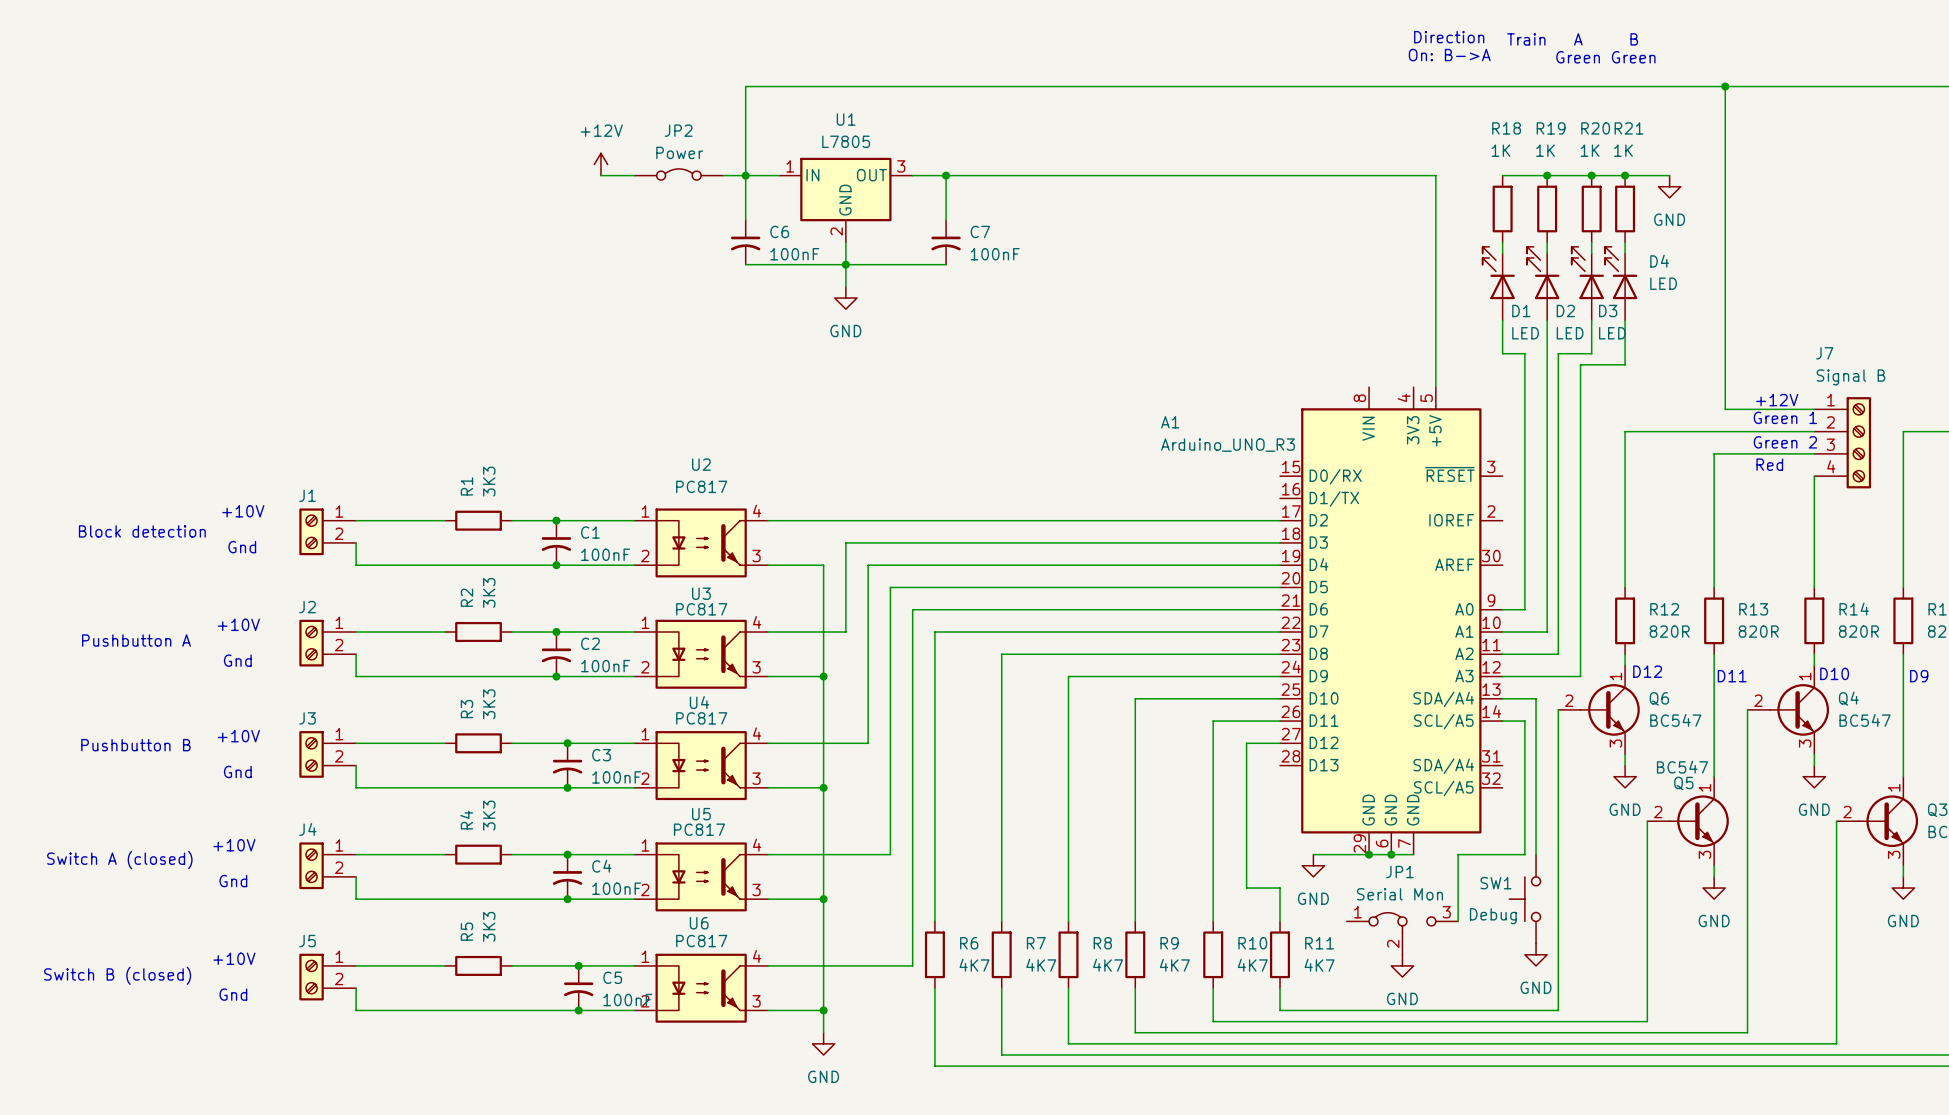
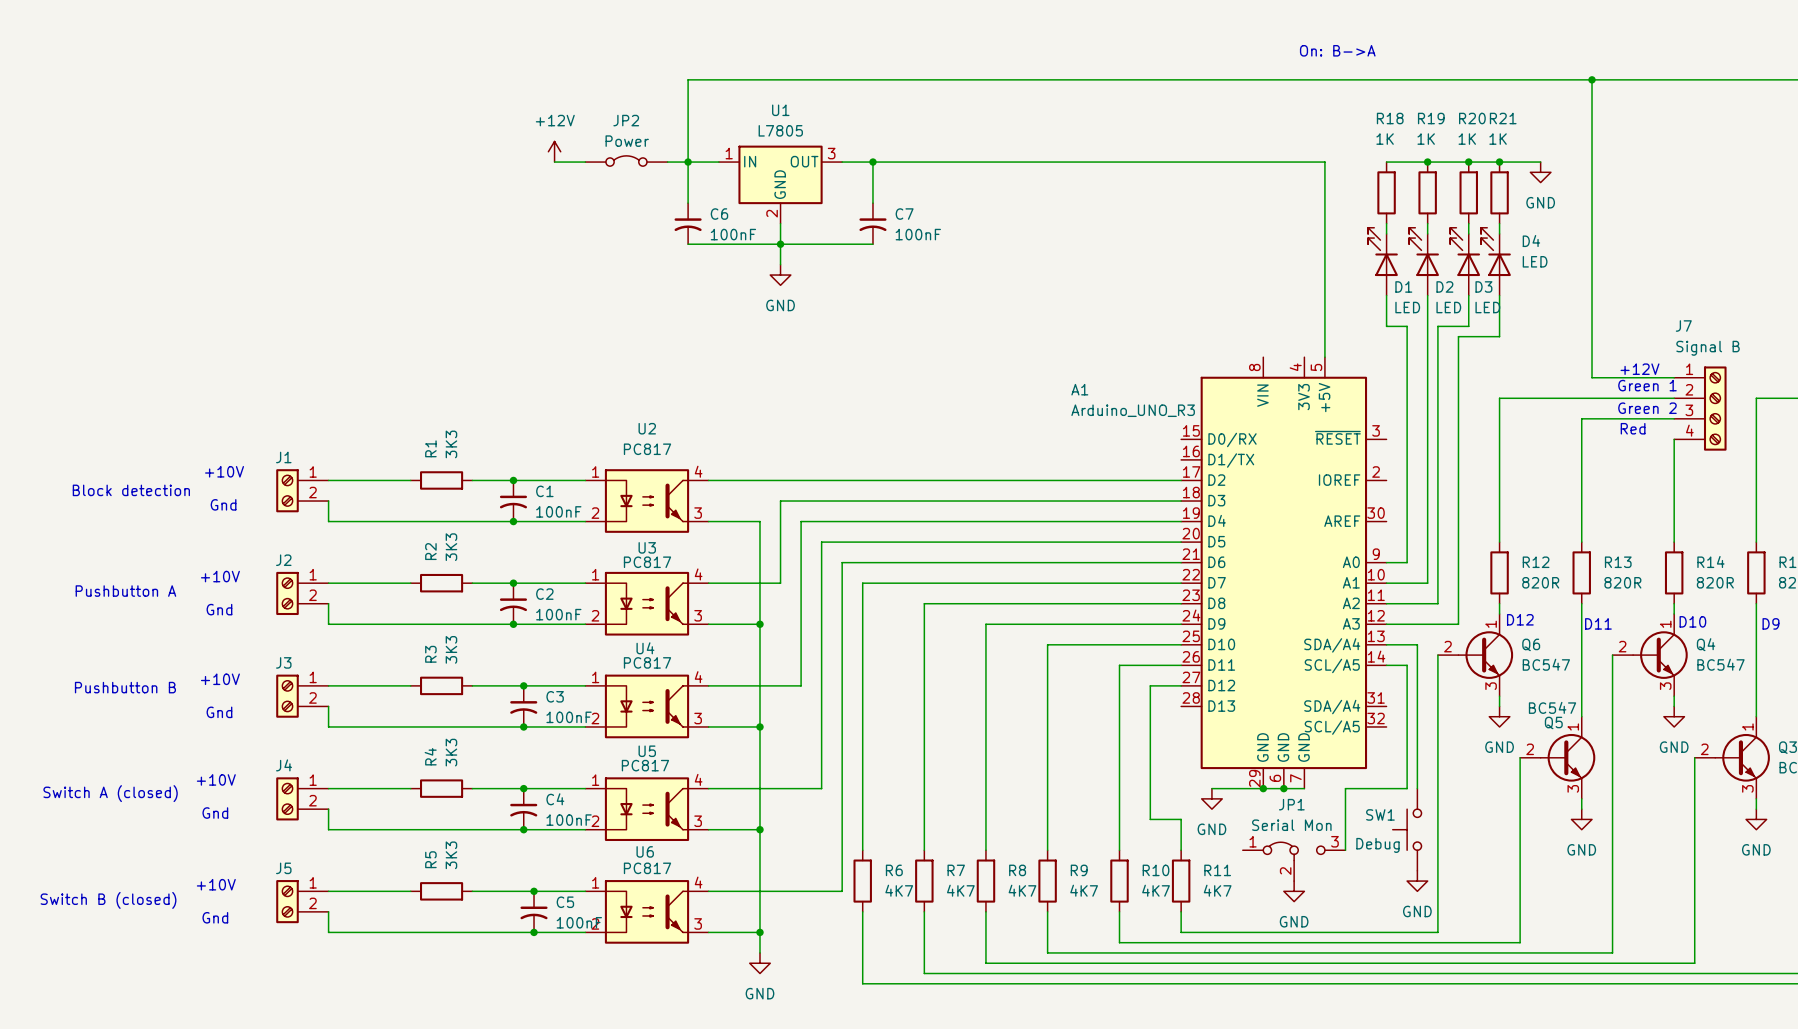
text: Direction (1449, 37) -> none
text: Train (1526, 39) -> none
text: A (1578, 39) -> none
text: B (1634, 39) -> none
text: Green (1578, 57) -> none
text: Green (1633, 57) -> none

